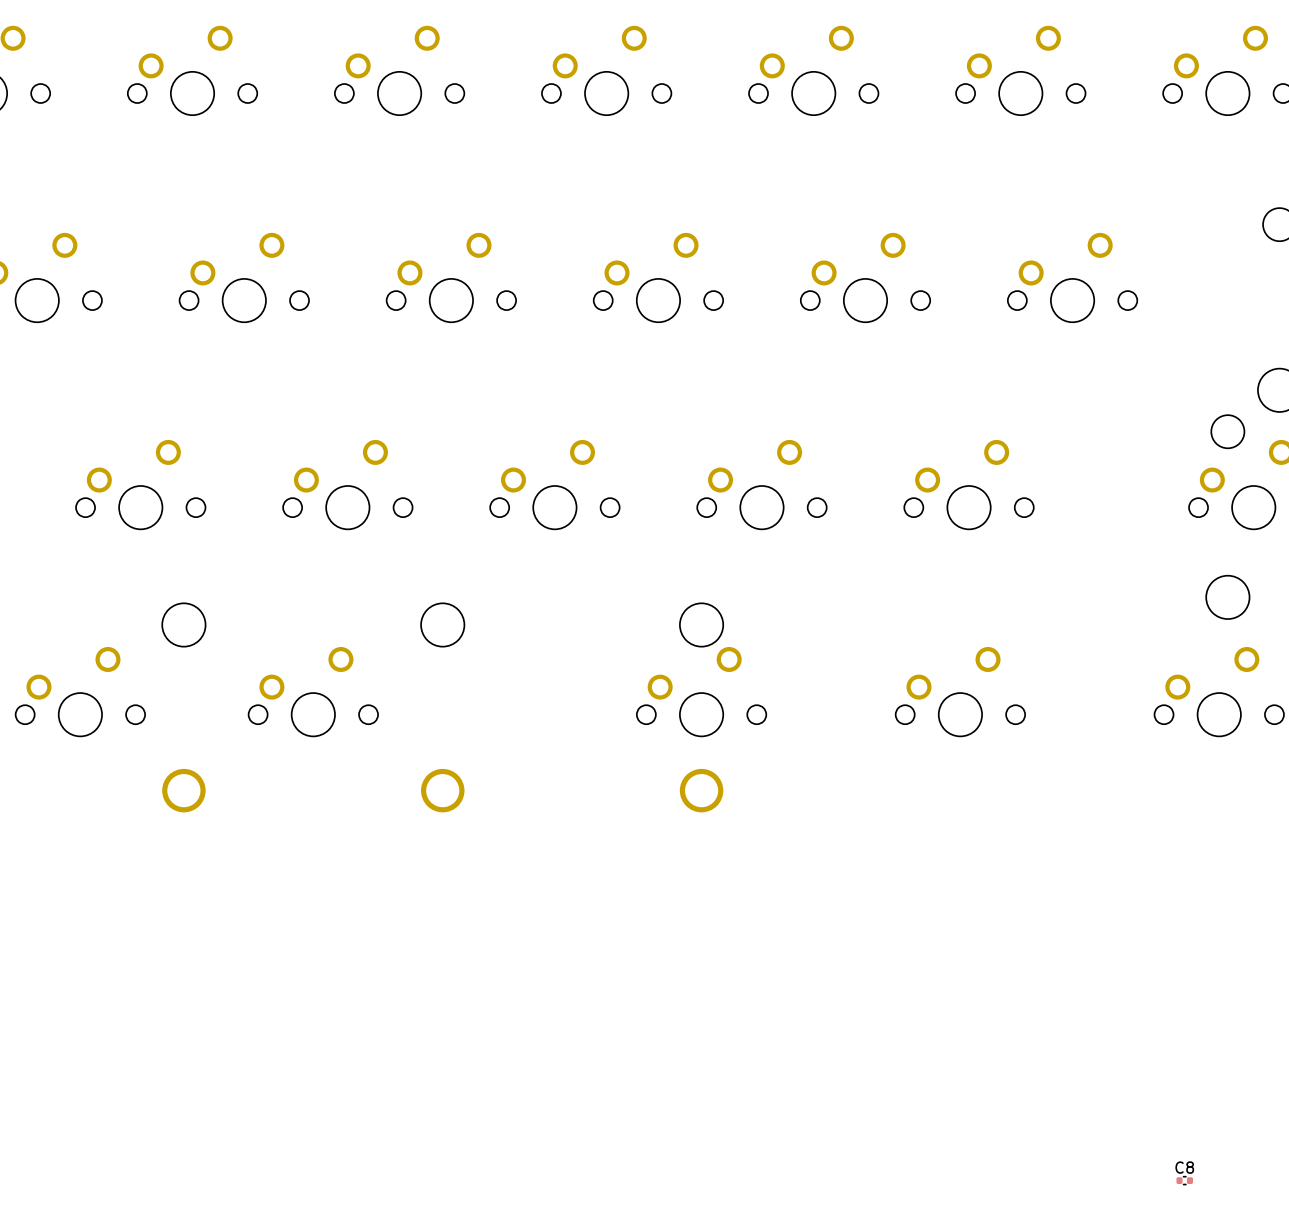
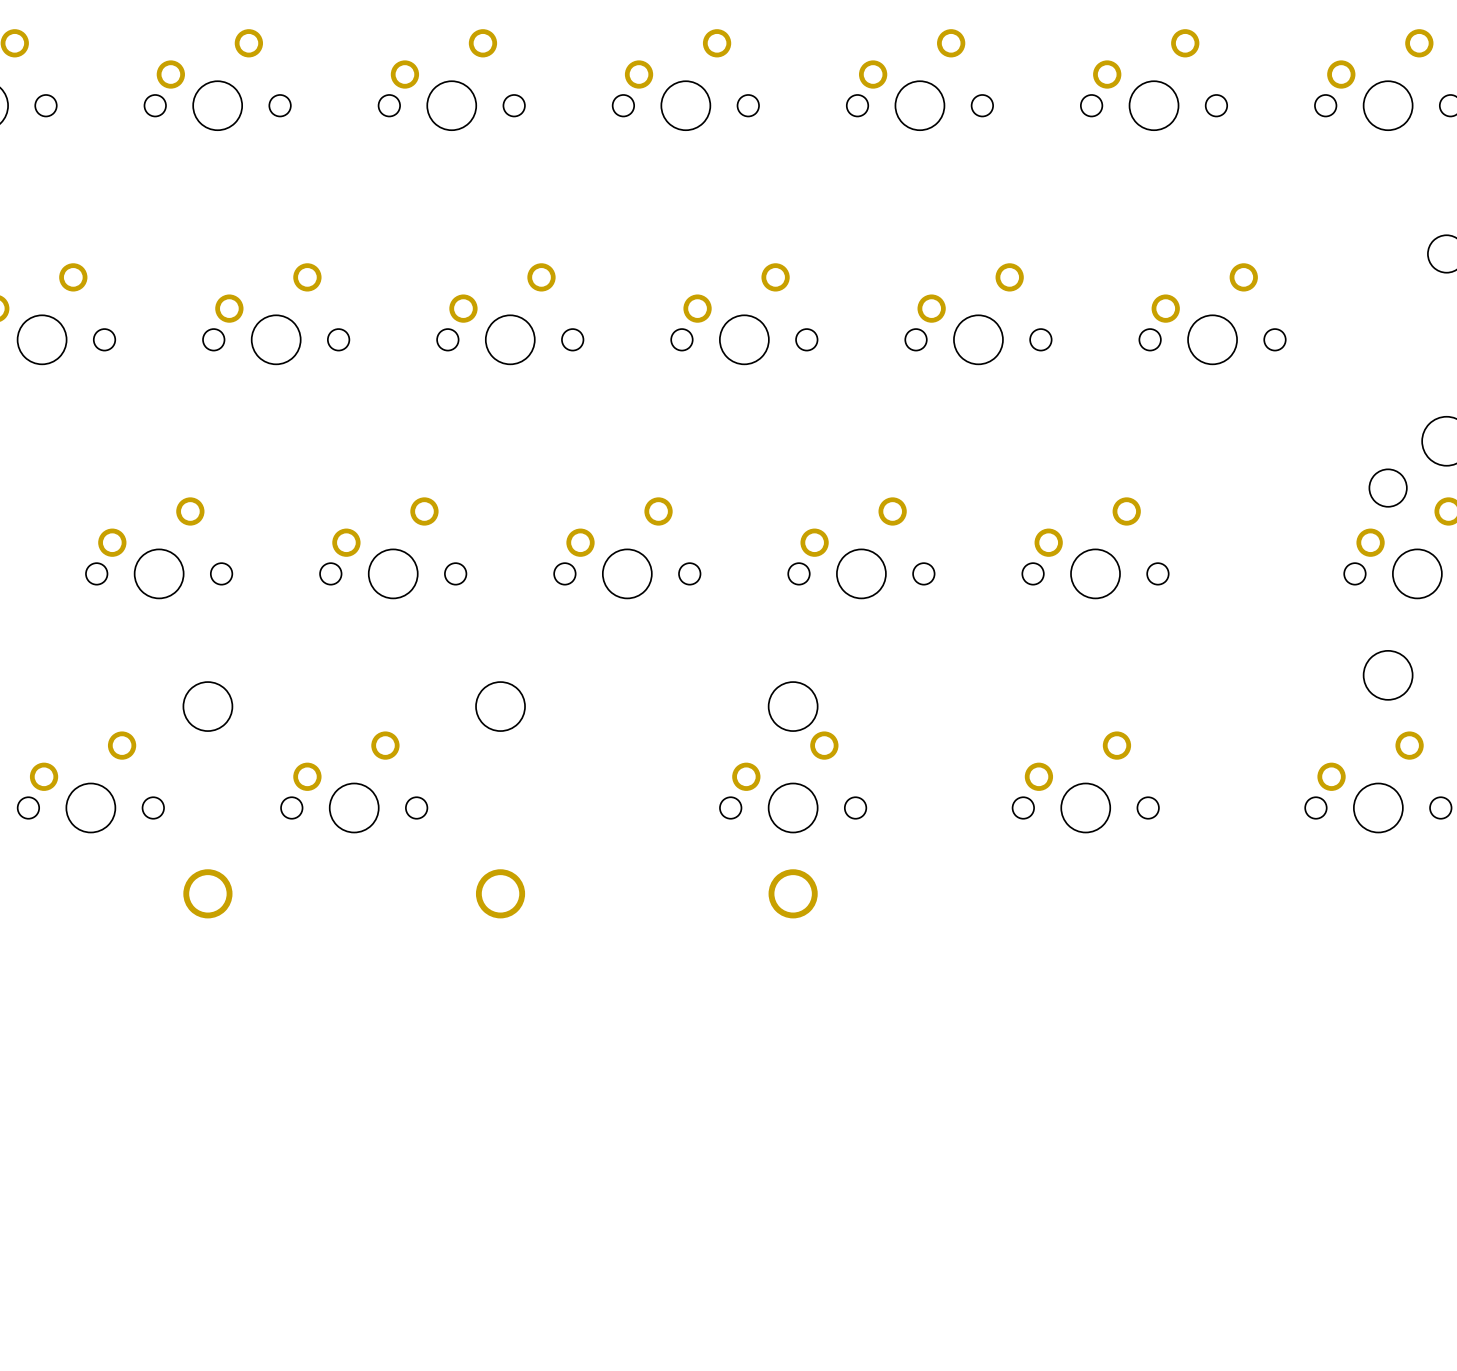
C8: (1184, 1180) -> none

